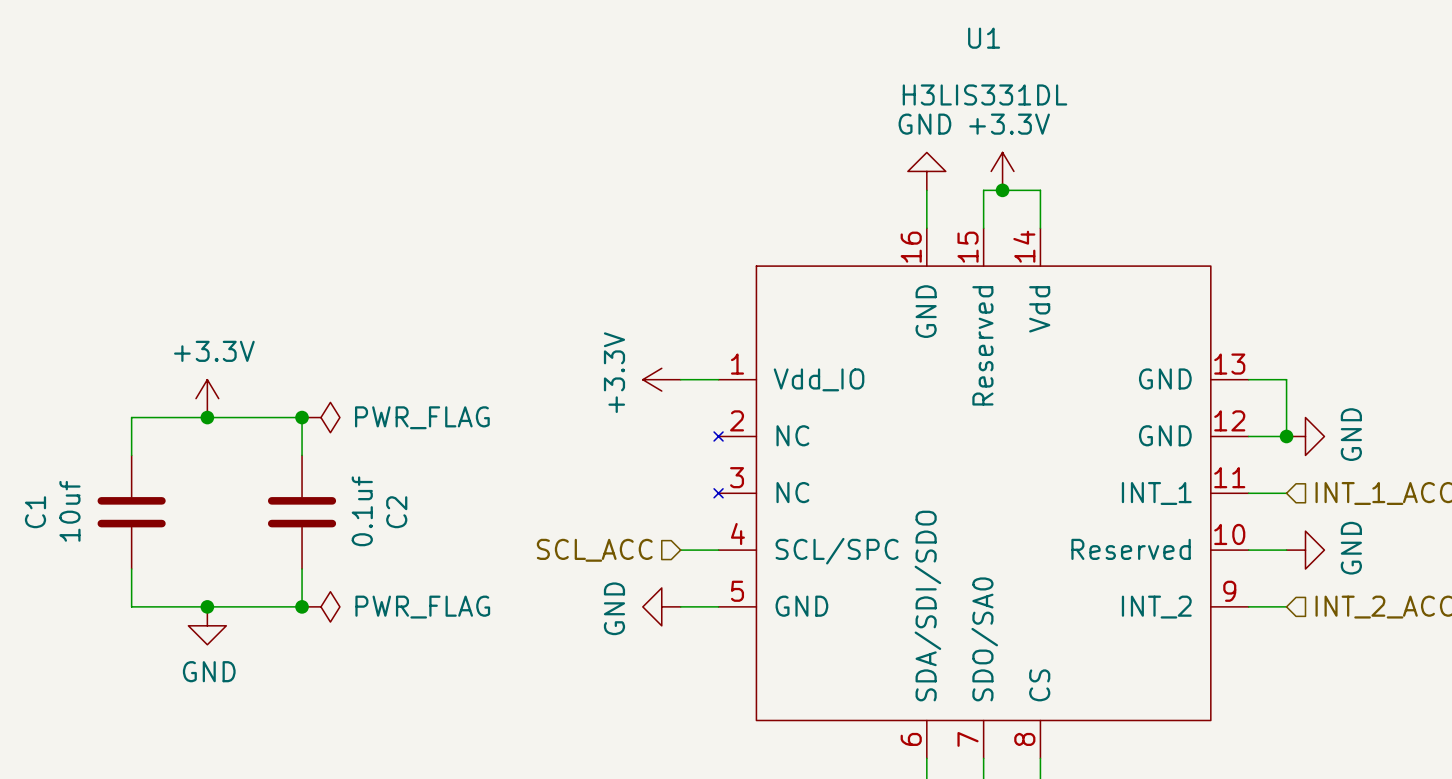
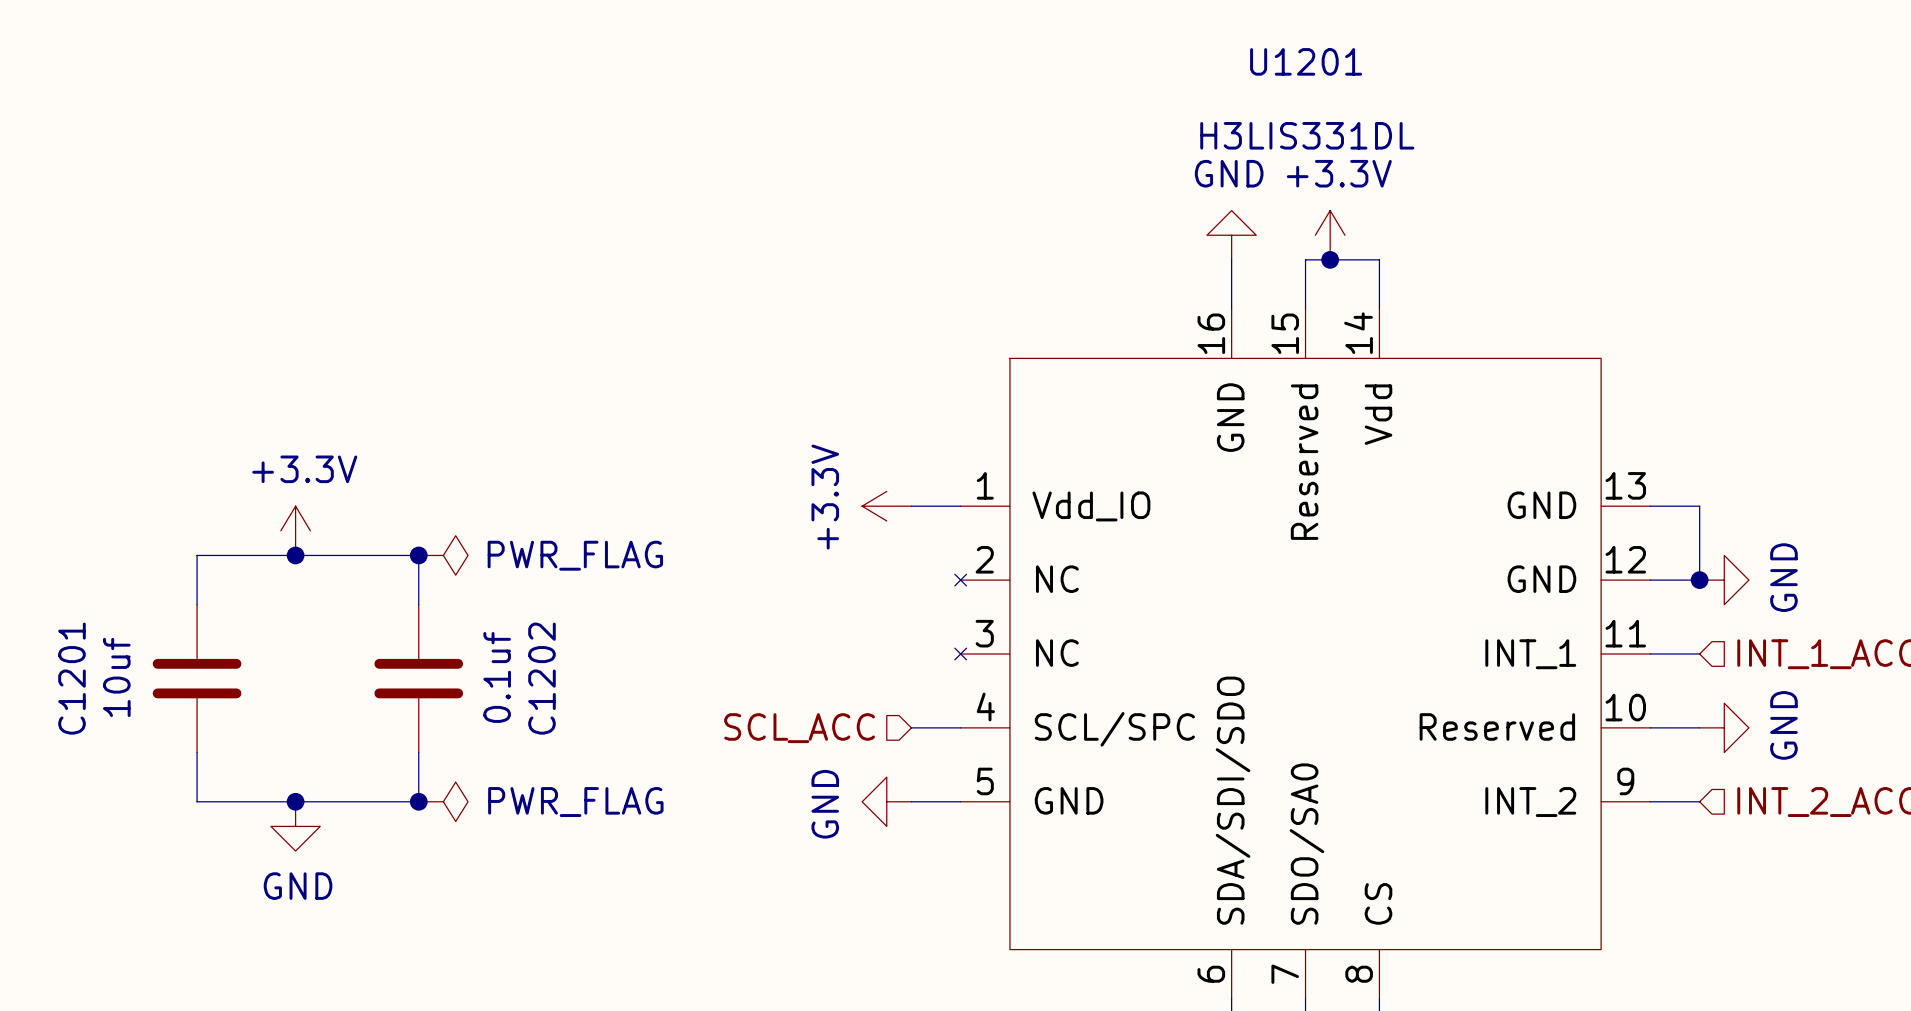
U1 name: U1 (984, 38) -> U1201 (1306, 61)
C1 name: C1 (35, 512) -> C1201 (71, 678)
C2 name: C2 (396, 512) -> C1202 (541, 678)

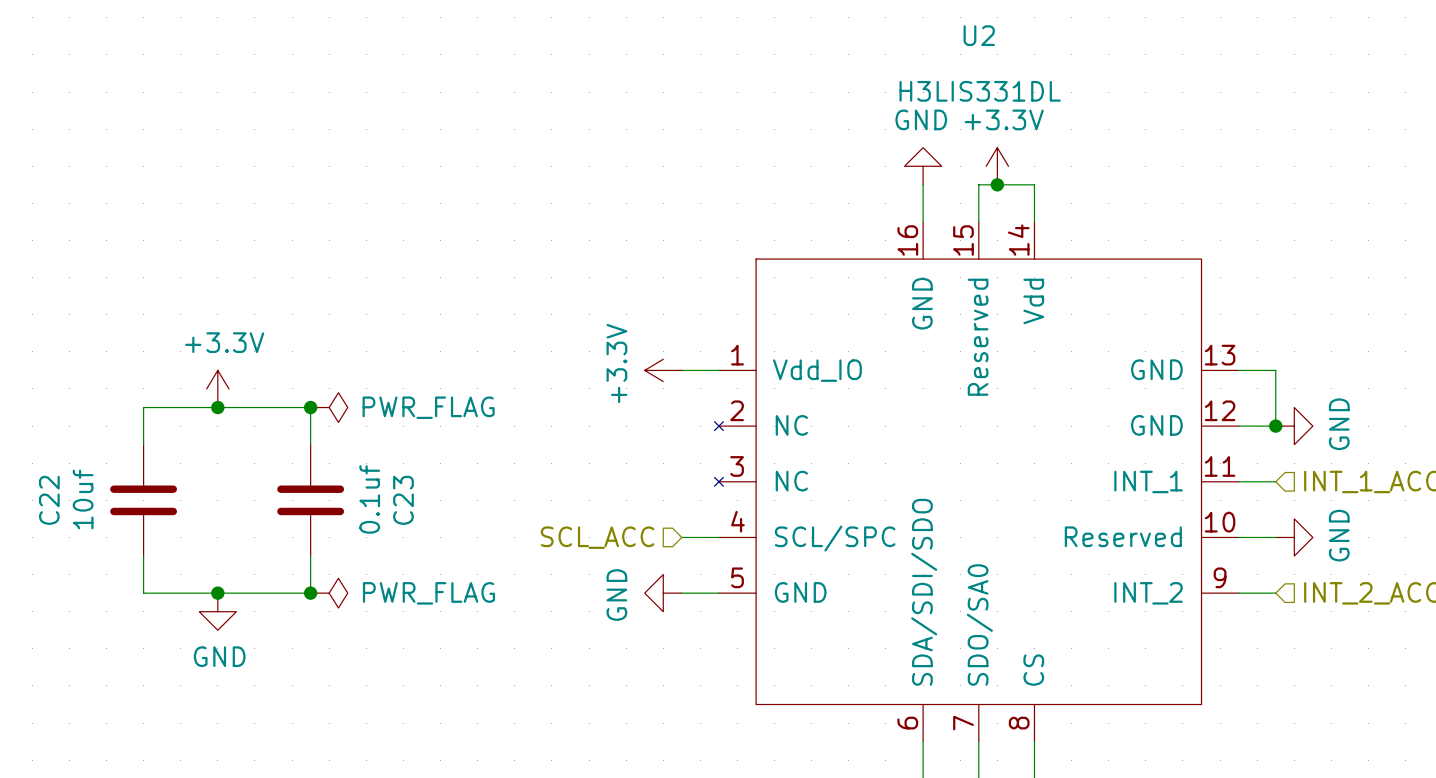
U1201 name: U1201 (1306, 61) -> U2 (979, 35)
C1201 name: C1201 (71, 678) -> C22 (49, 500)
C1202 name: C1202 (541, 678) -> C23 (403, 500)

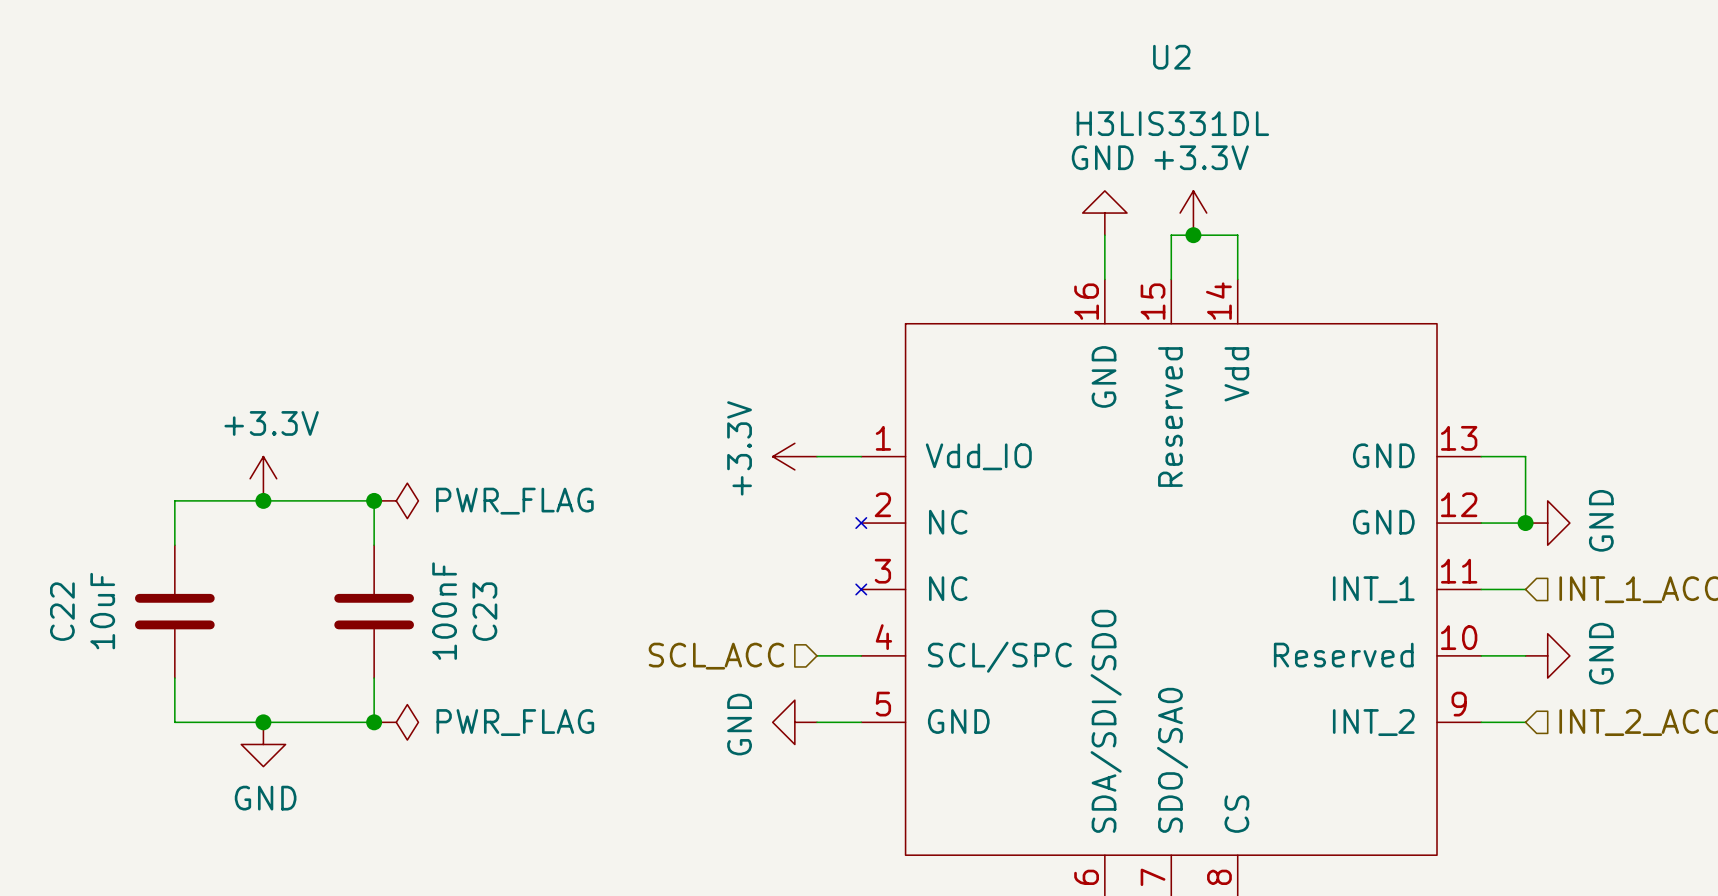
C22 value: 10uf (83, 499) -> 10uF (102, 611)
C23 value: 0.1uf (369, 499) -> 100nF (444, 611)

